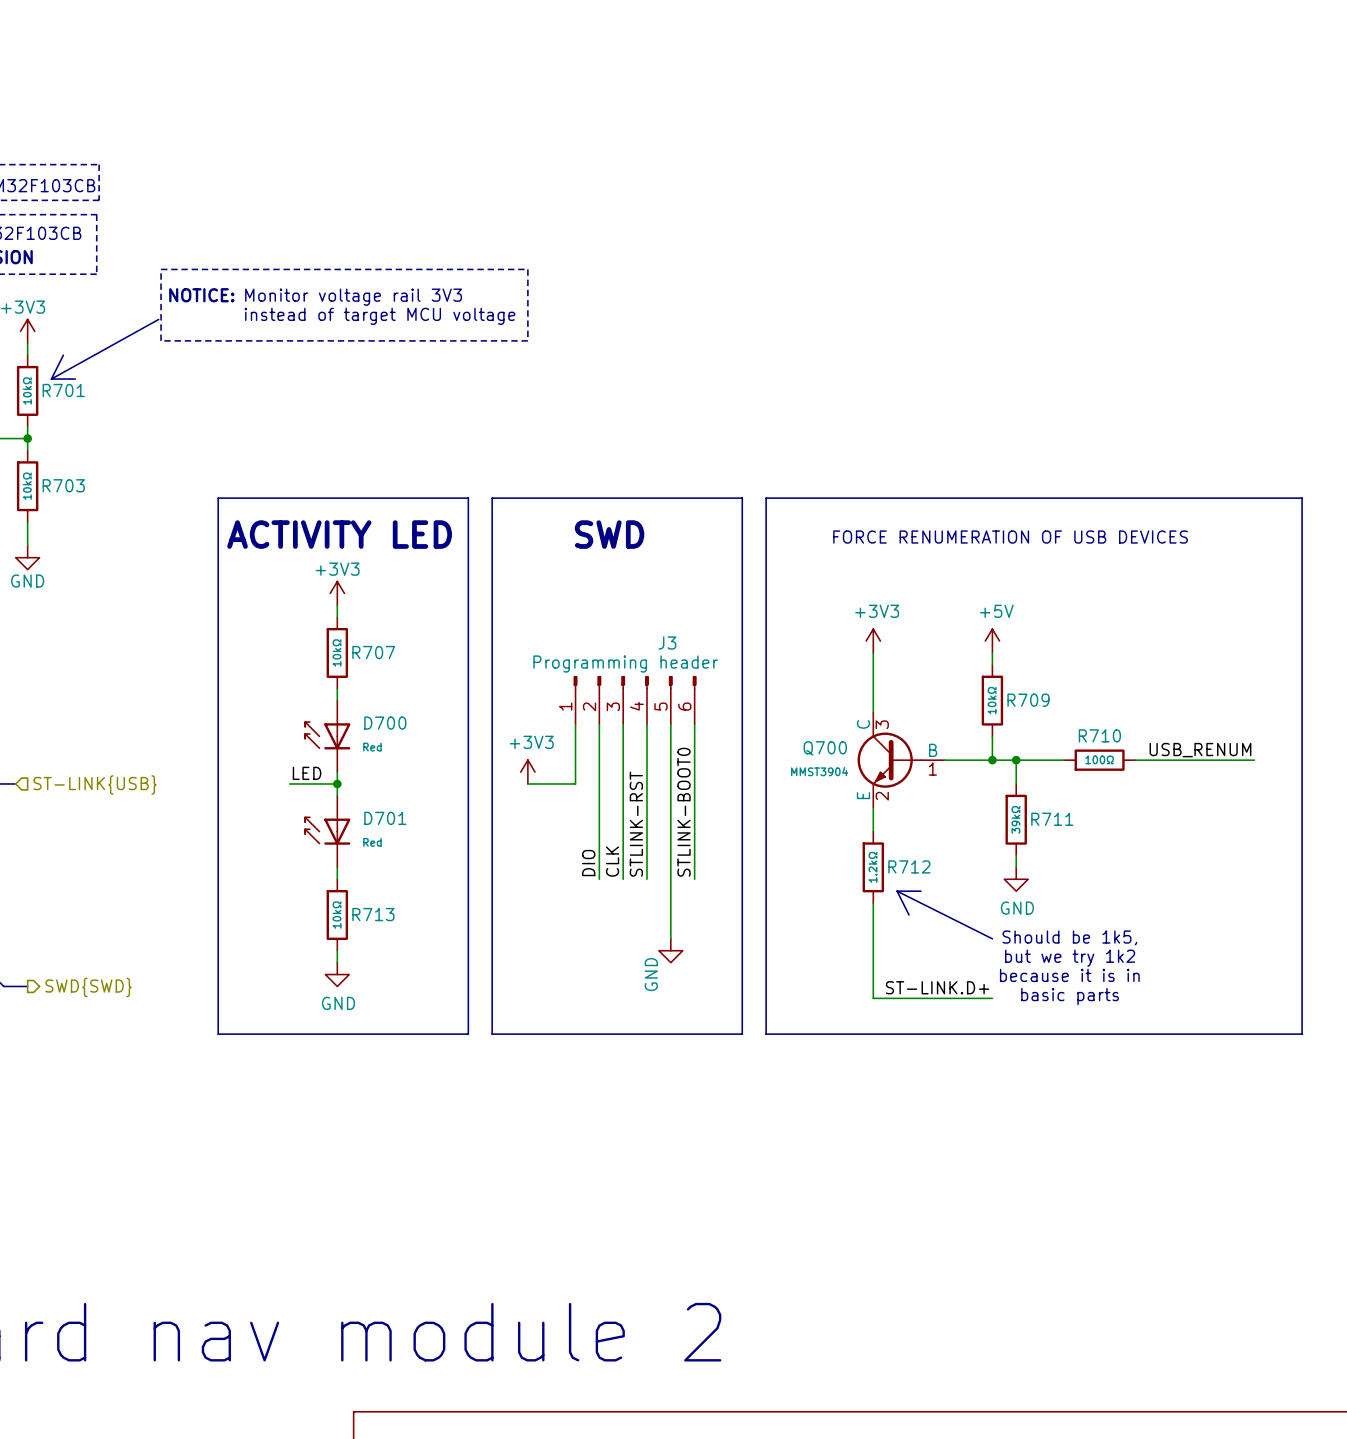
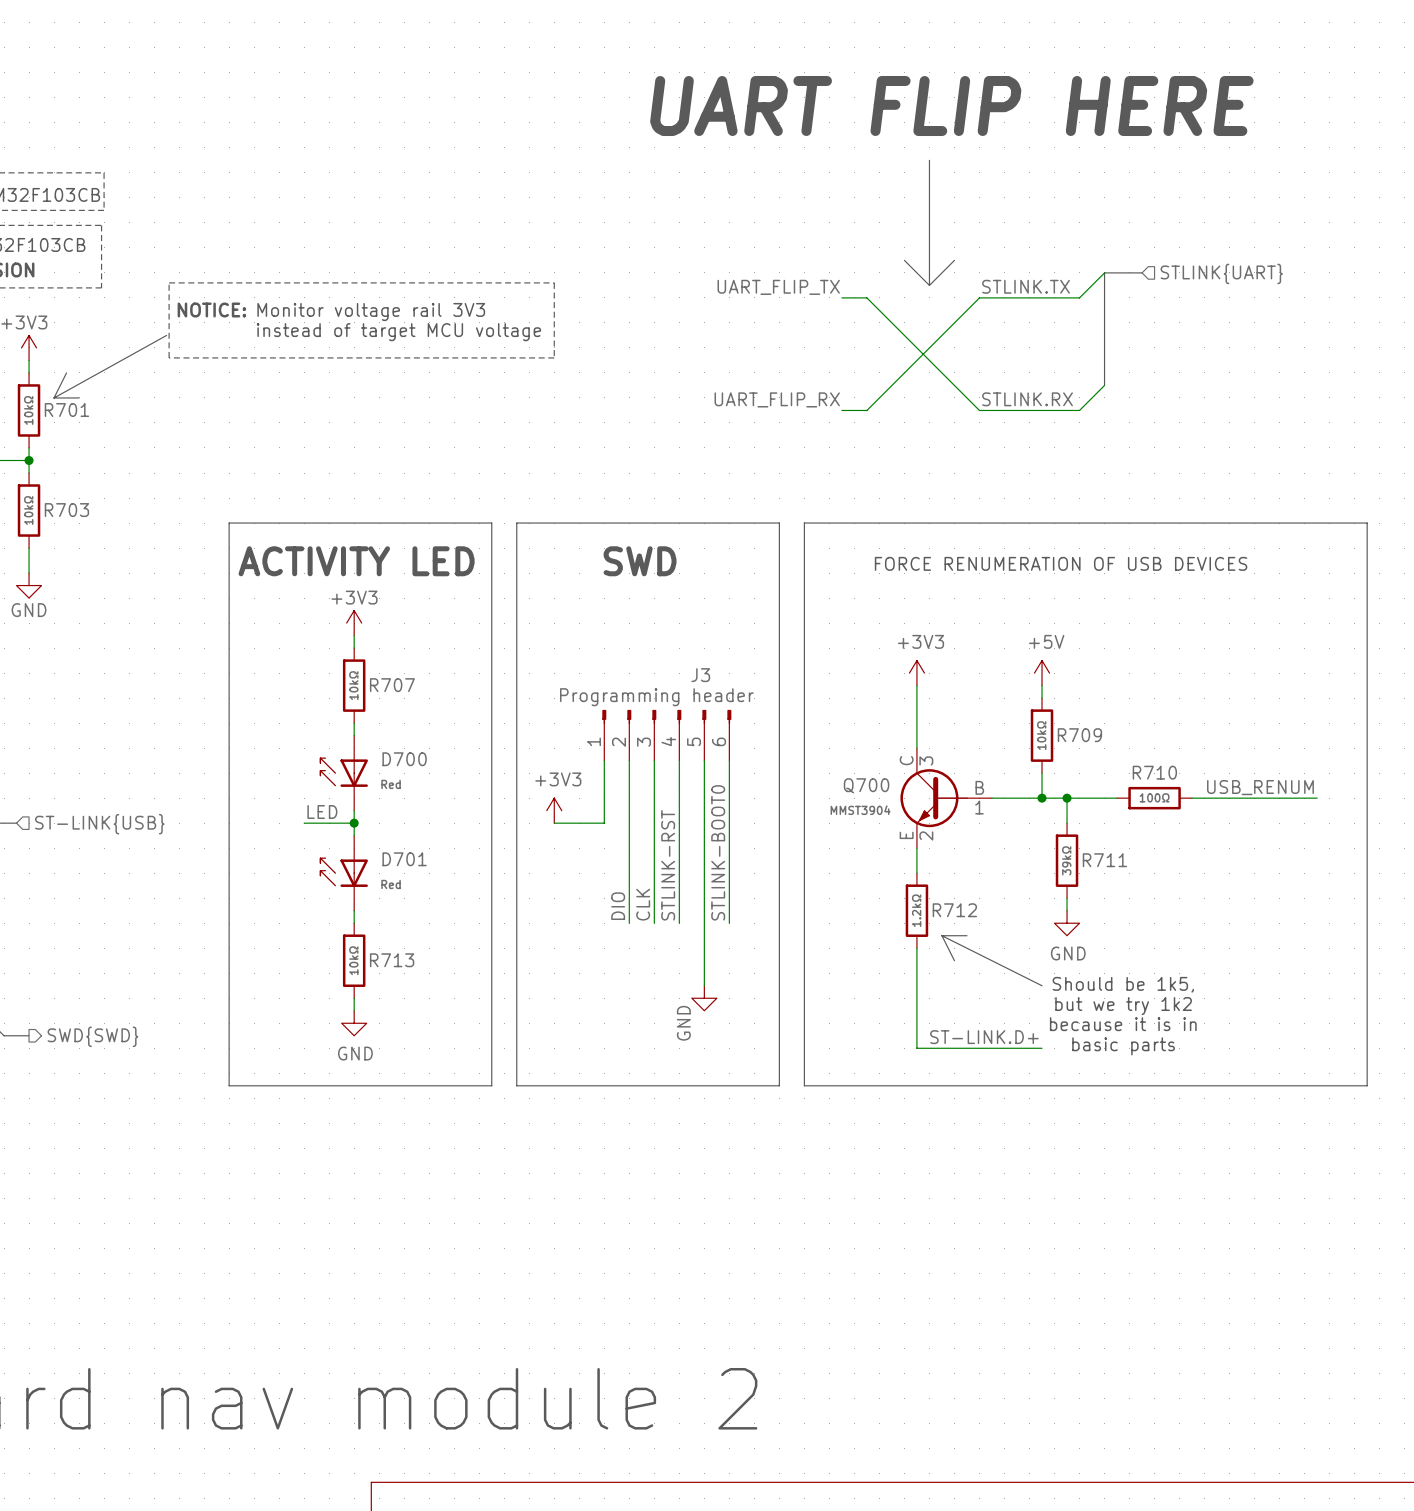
text: none -> UART FLIP HERE (951, 106)
line: none -> (929, 160) (929, 285)
line: none -> (904, 260) (929, 285)
line: none -> (954, 260) (929, 285)
wire: none -> (1104, 272) (1079, 297) (979, 297) (866, 410) (841, 410)
bus: none -> (1142, 272) (1104, 272) (1104, 385)
hierarchical label: none -> STLINK{UART} (1221, 273)
label: none -> UART_FLIP_TX (778, 287)
label: none -> STLINK.TX (1026, 286)
wire: none -> (841, 297) (866, 297) (979, 410) (1079, 410) (1104, 385)
label: none -> UART_FLIP_RX (777, 399)
label: none -> STLINK.RX (1027, 399)

